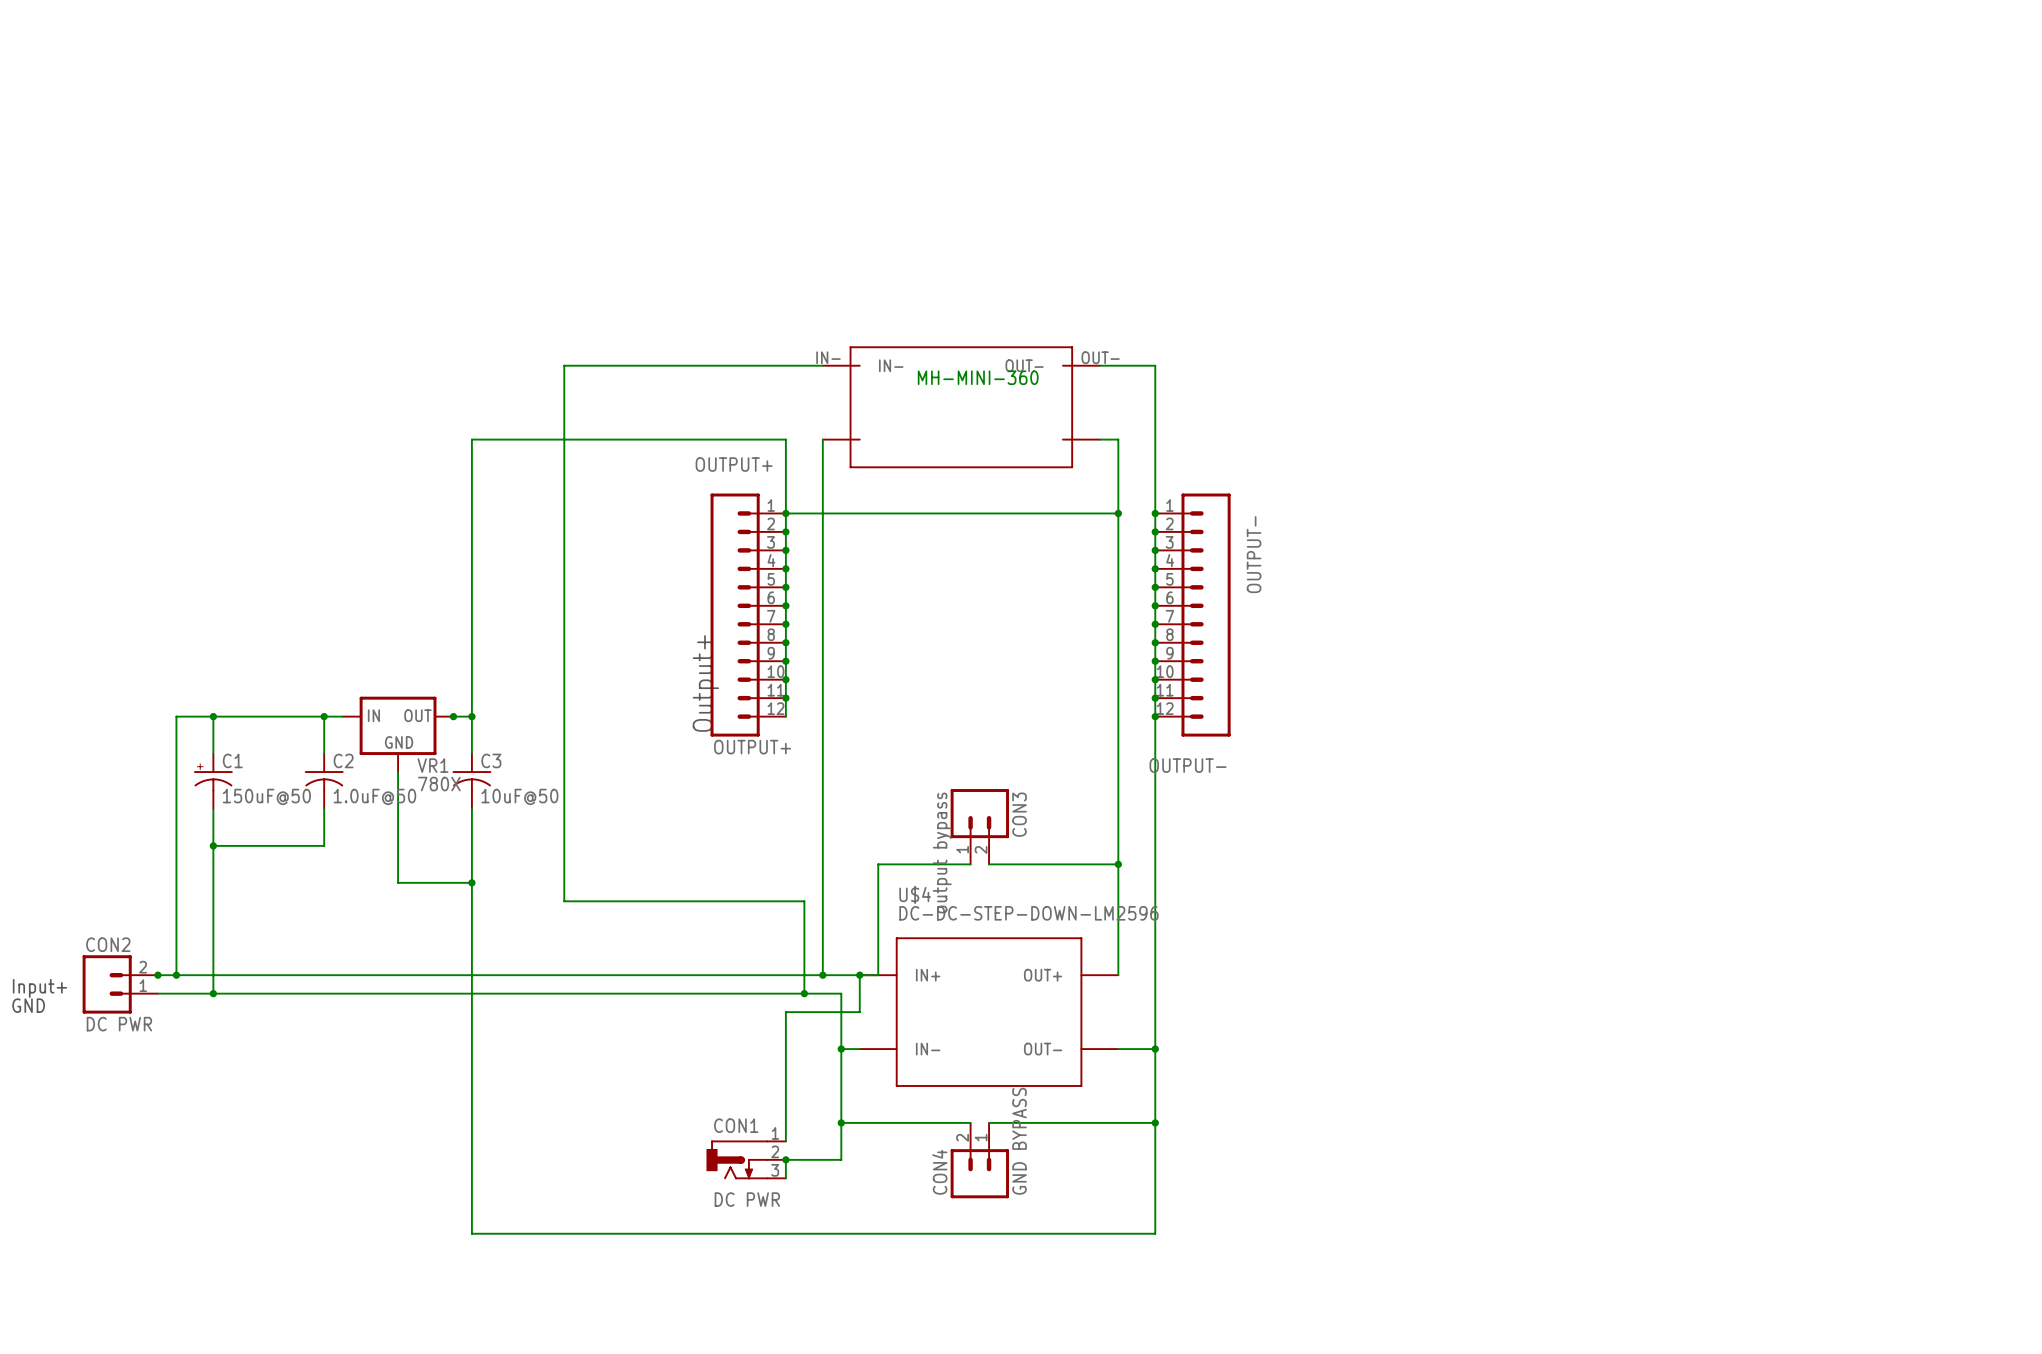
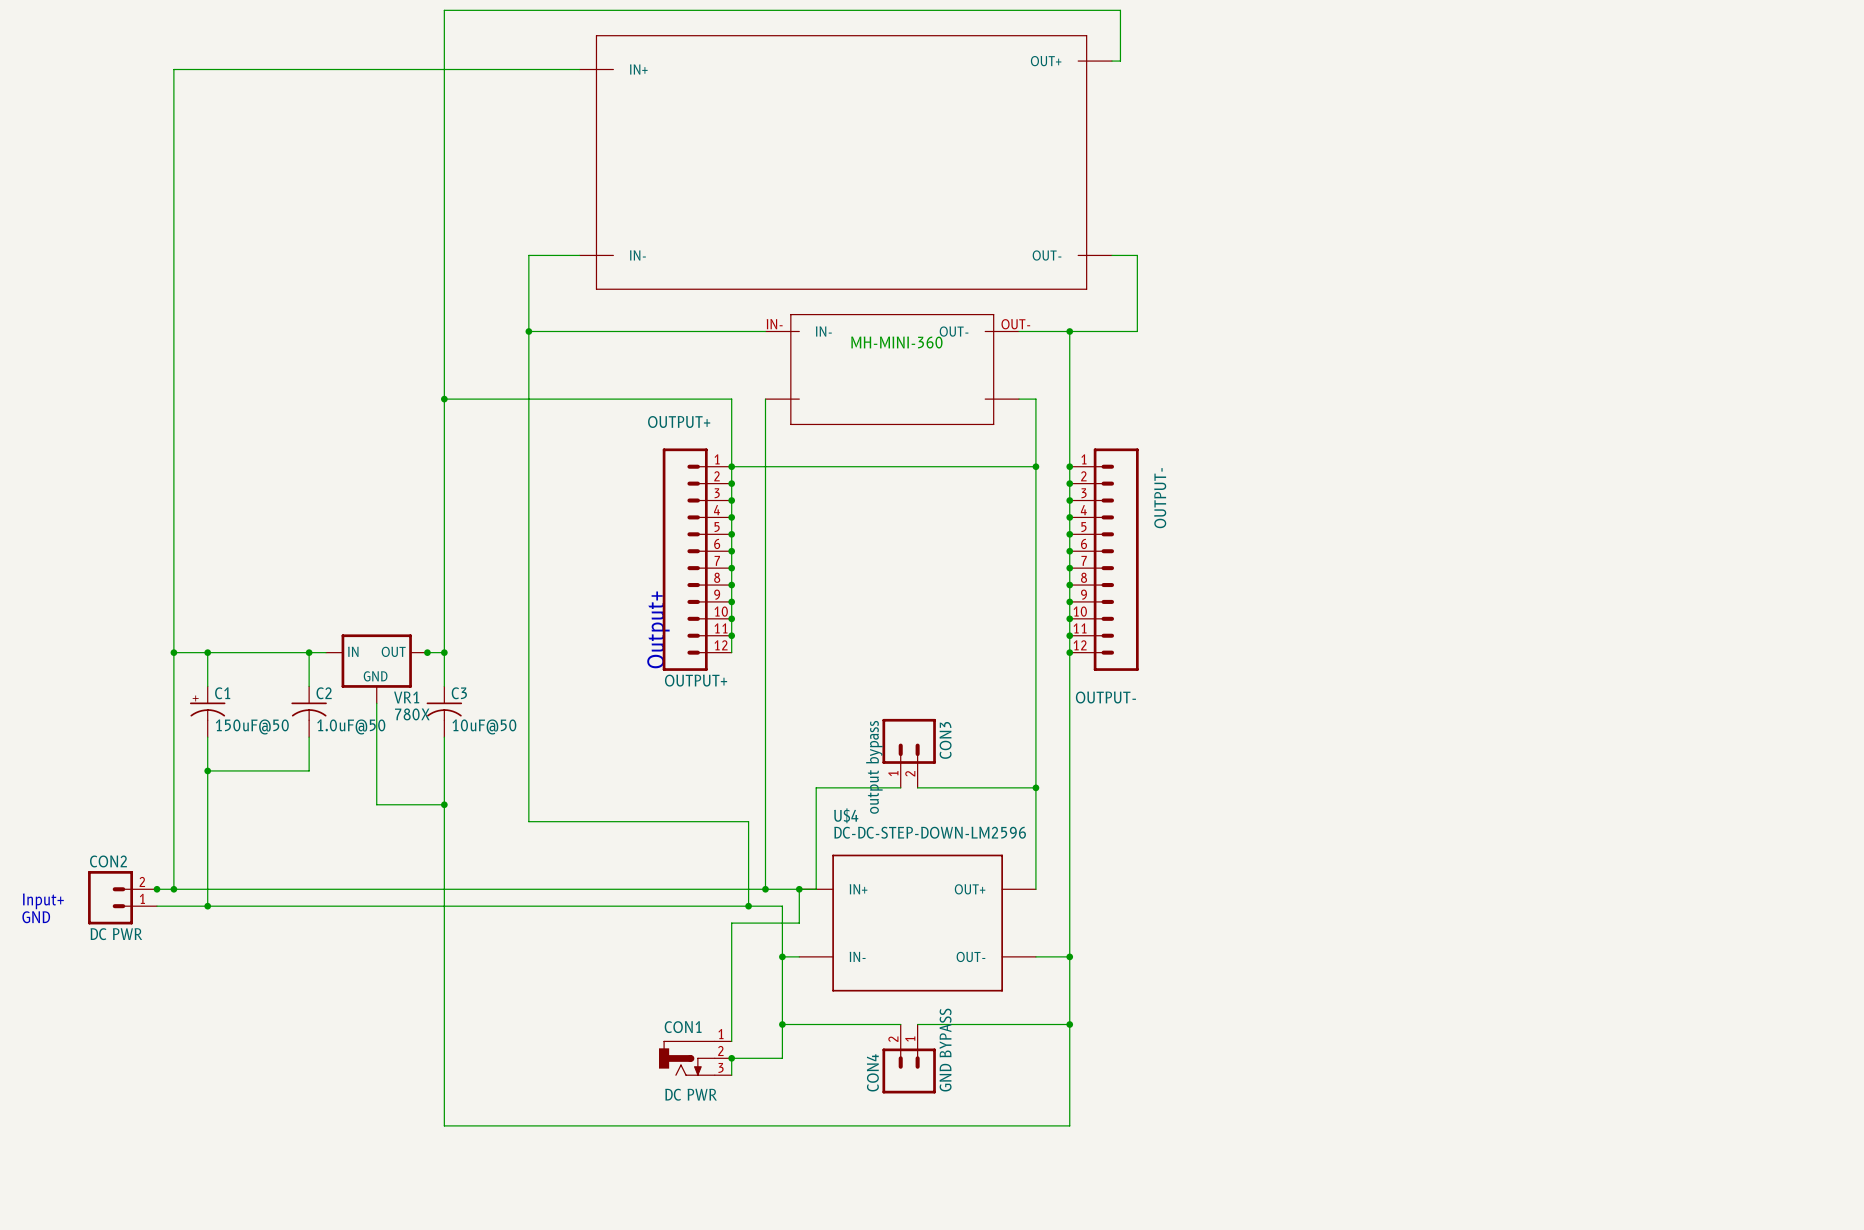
wire: none -> (1112, 61) (1120, 61) (1120, 10) (444, 10) (444, 399)
wire: none -> (579, 69) (173, 69) (173, 652)
part: none -> (845, 162)
wire: none -> (579, 255) (528, 255) (528, 331)
wire: none -> (1112, 255) (1137, 255) (1137, 331) (1069, 331)
junction: none -> (528, 331)
junction: none -> (1069, 331)
junction: none -> (444, 399)
junction: none -> (173, 652)

